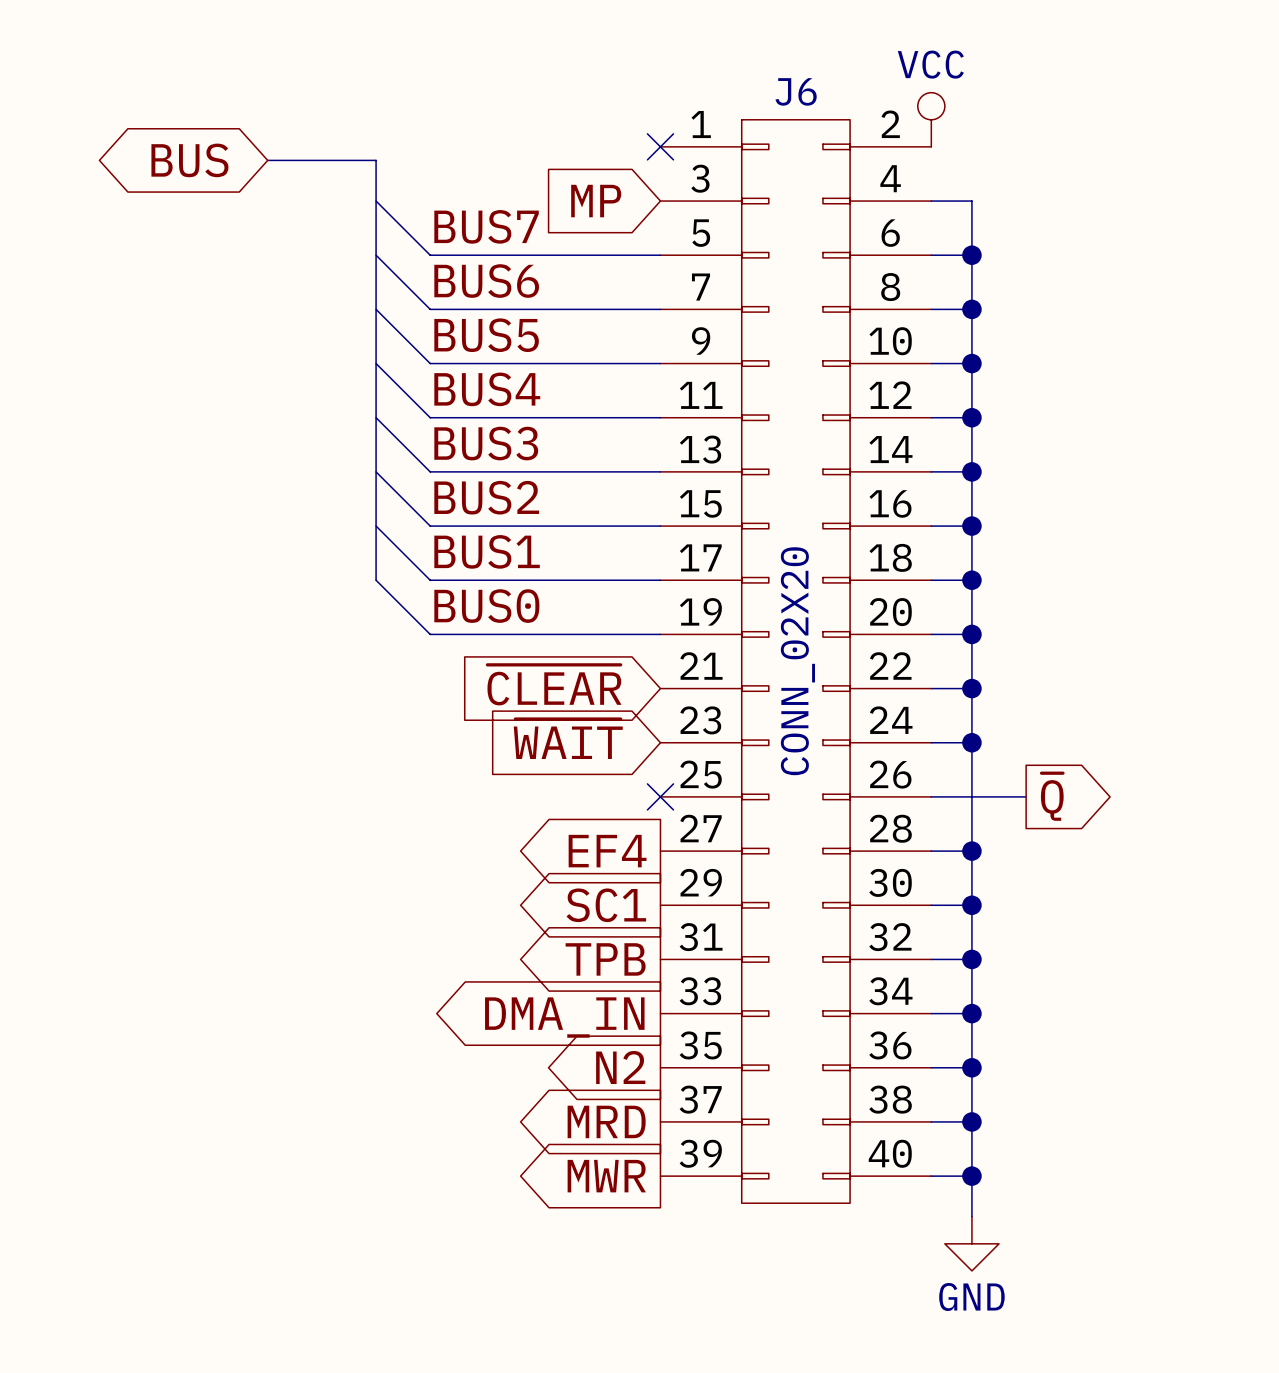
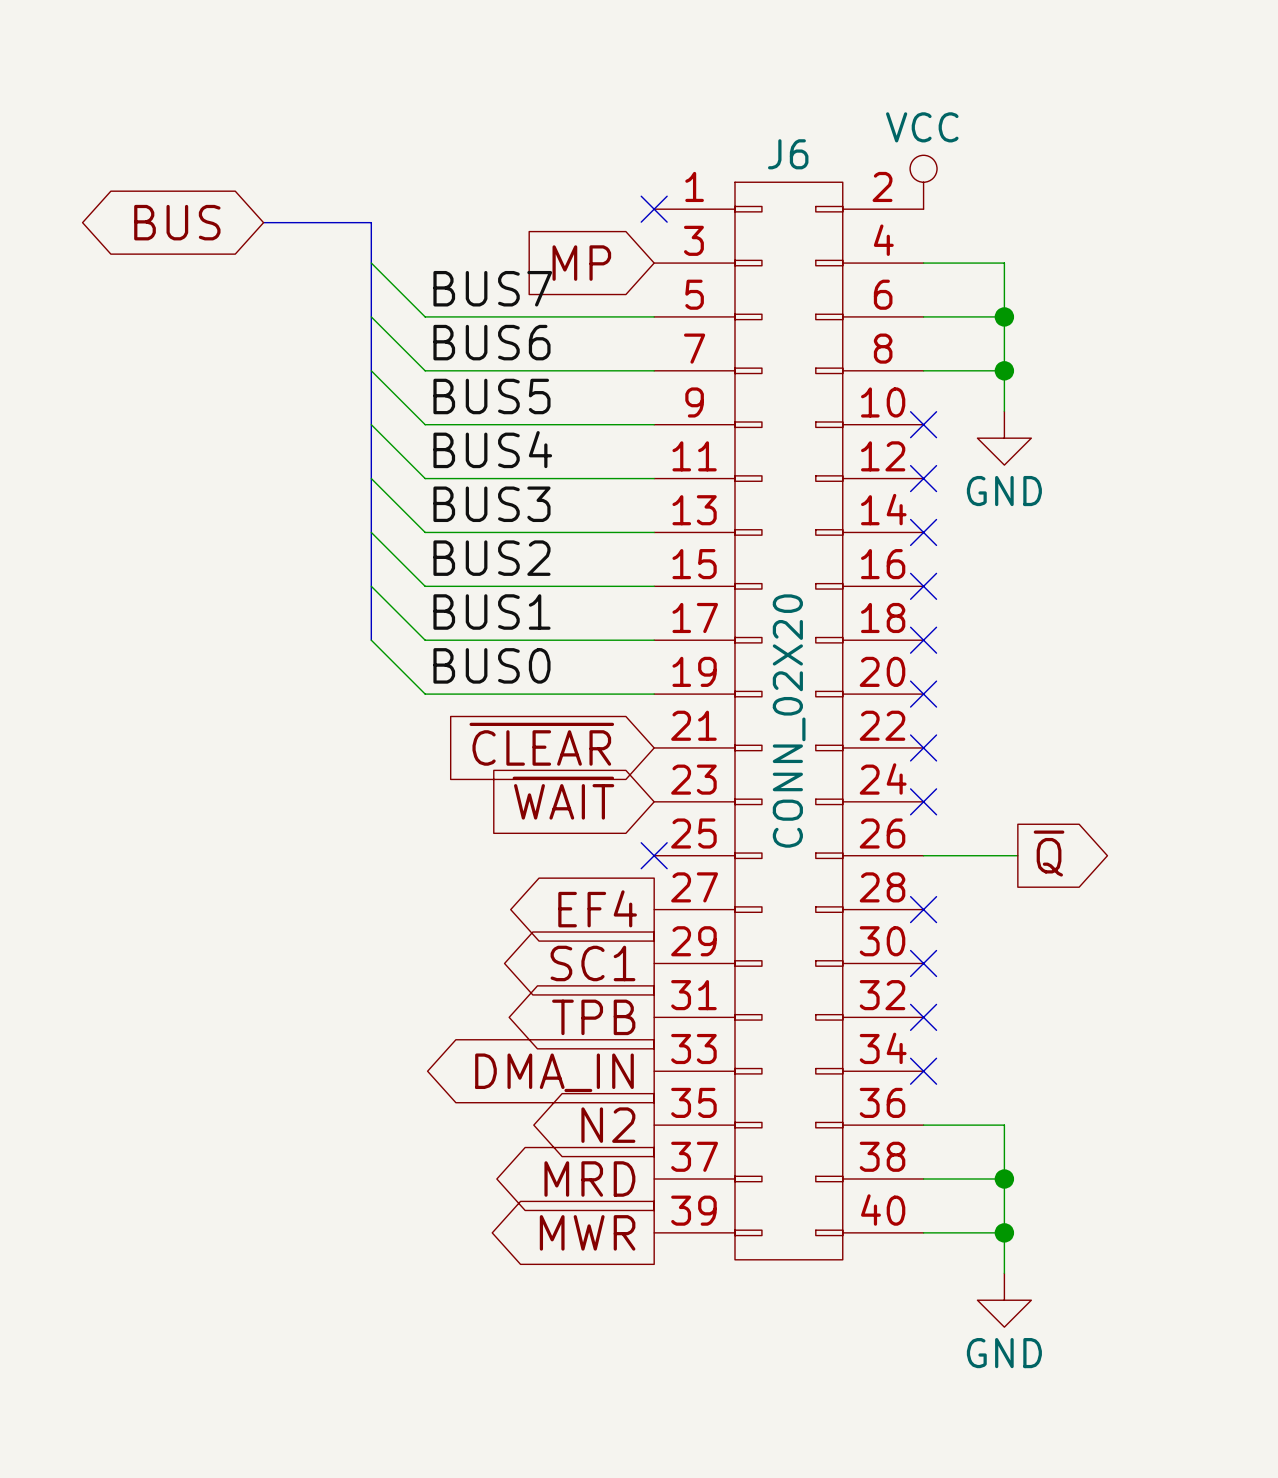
wire: (971, 201) (971, 1216) -> (963, 263) (1004, 263) (1004, 411)
junction: (971, 255) -> none
junction: none -> (1004, 316)
junction: (971, 309) -> none
junction: none -> (1004, 370)
wire: (931, 363) (971, 363) -> (963, 316) (1004, 316)
no-connect mark: none -> (923, 424)
junction: (971, 363) -> none
power symbol: none -> GND (1004, 438)
wire: (931, 417) (971, 417) -> (963, 370) (1004, 370)
no-connect mark: none -> (923, 478)
junction: (971, 417) -> none
wire: (931, 471) (971, 471) -> none
no-connect mark: none -> (923, 532)
junction: (971, 471) -> none
wire: (931, 526) (971, 526) -> none
no-connect mark: none -> (923, 586)
junction: (971, 526) -> none
wire: (931, 580) (971, 580) -> none
no-connect mark: none -> (923, 640)
junction: (971, 580) -> none
wire: (931, 634) (971, 634) -> none
no-connect mark: none -> (923, 694)
junction: (971, 634) -> none
wire: (931, 688) (971, 688) -> none
no-connect mark: none -> (923, 747)
junction: (971, 688) -> none
wire: (931, 742) (971, 742) -> none
no-connect mark: none -> (923, 801)
junction: (971, 742) -> none
wire: (931, 851) (971, 851) -> none
no-connect mark: none -> (923, 909)
junction: (971, 851) -> none
wire: (931, 905) (971, 905) -> none
no-connect mark: none -> (923, 963)
junction: (971, 905) -> none
wire: (931, 959) (971, 959) -> (963, 1178) (1004, 1178)
no-connect mark: none -> (923, 1017)
junction: (971, 959) -> none
wire: (931, 1013) (971, 1013) -> (963, 1232) (1004, 1232)
no-connect mark: none -> (923, 1071)
junction: (971, 1013) -> none
wire: none -> (963, 1125) (1004, 1125) (1004, 1273)
junction: (971, 1067) -> none
junction: (971, 1121) -> none
junction: none -> (1004, 1178)
junction: (971, 1176) -> none
junction: none -> (1004, 1232)
power symbol position: GND (971, 1243) -> GND (1004, 1300)

